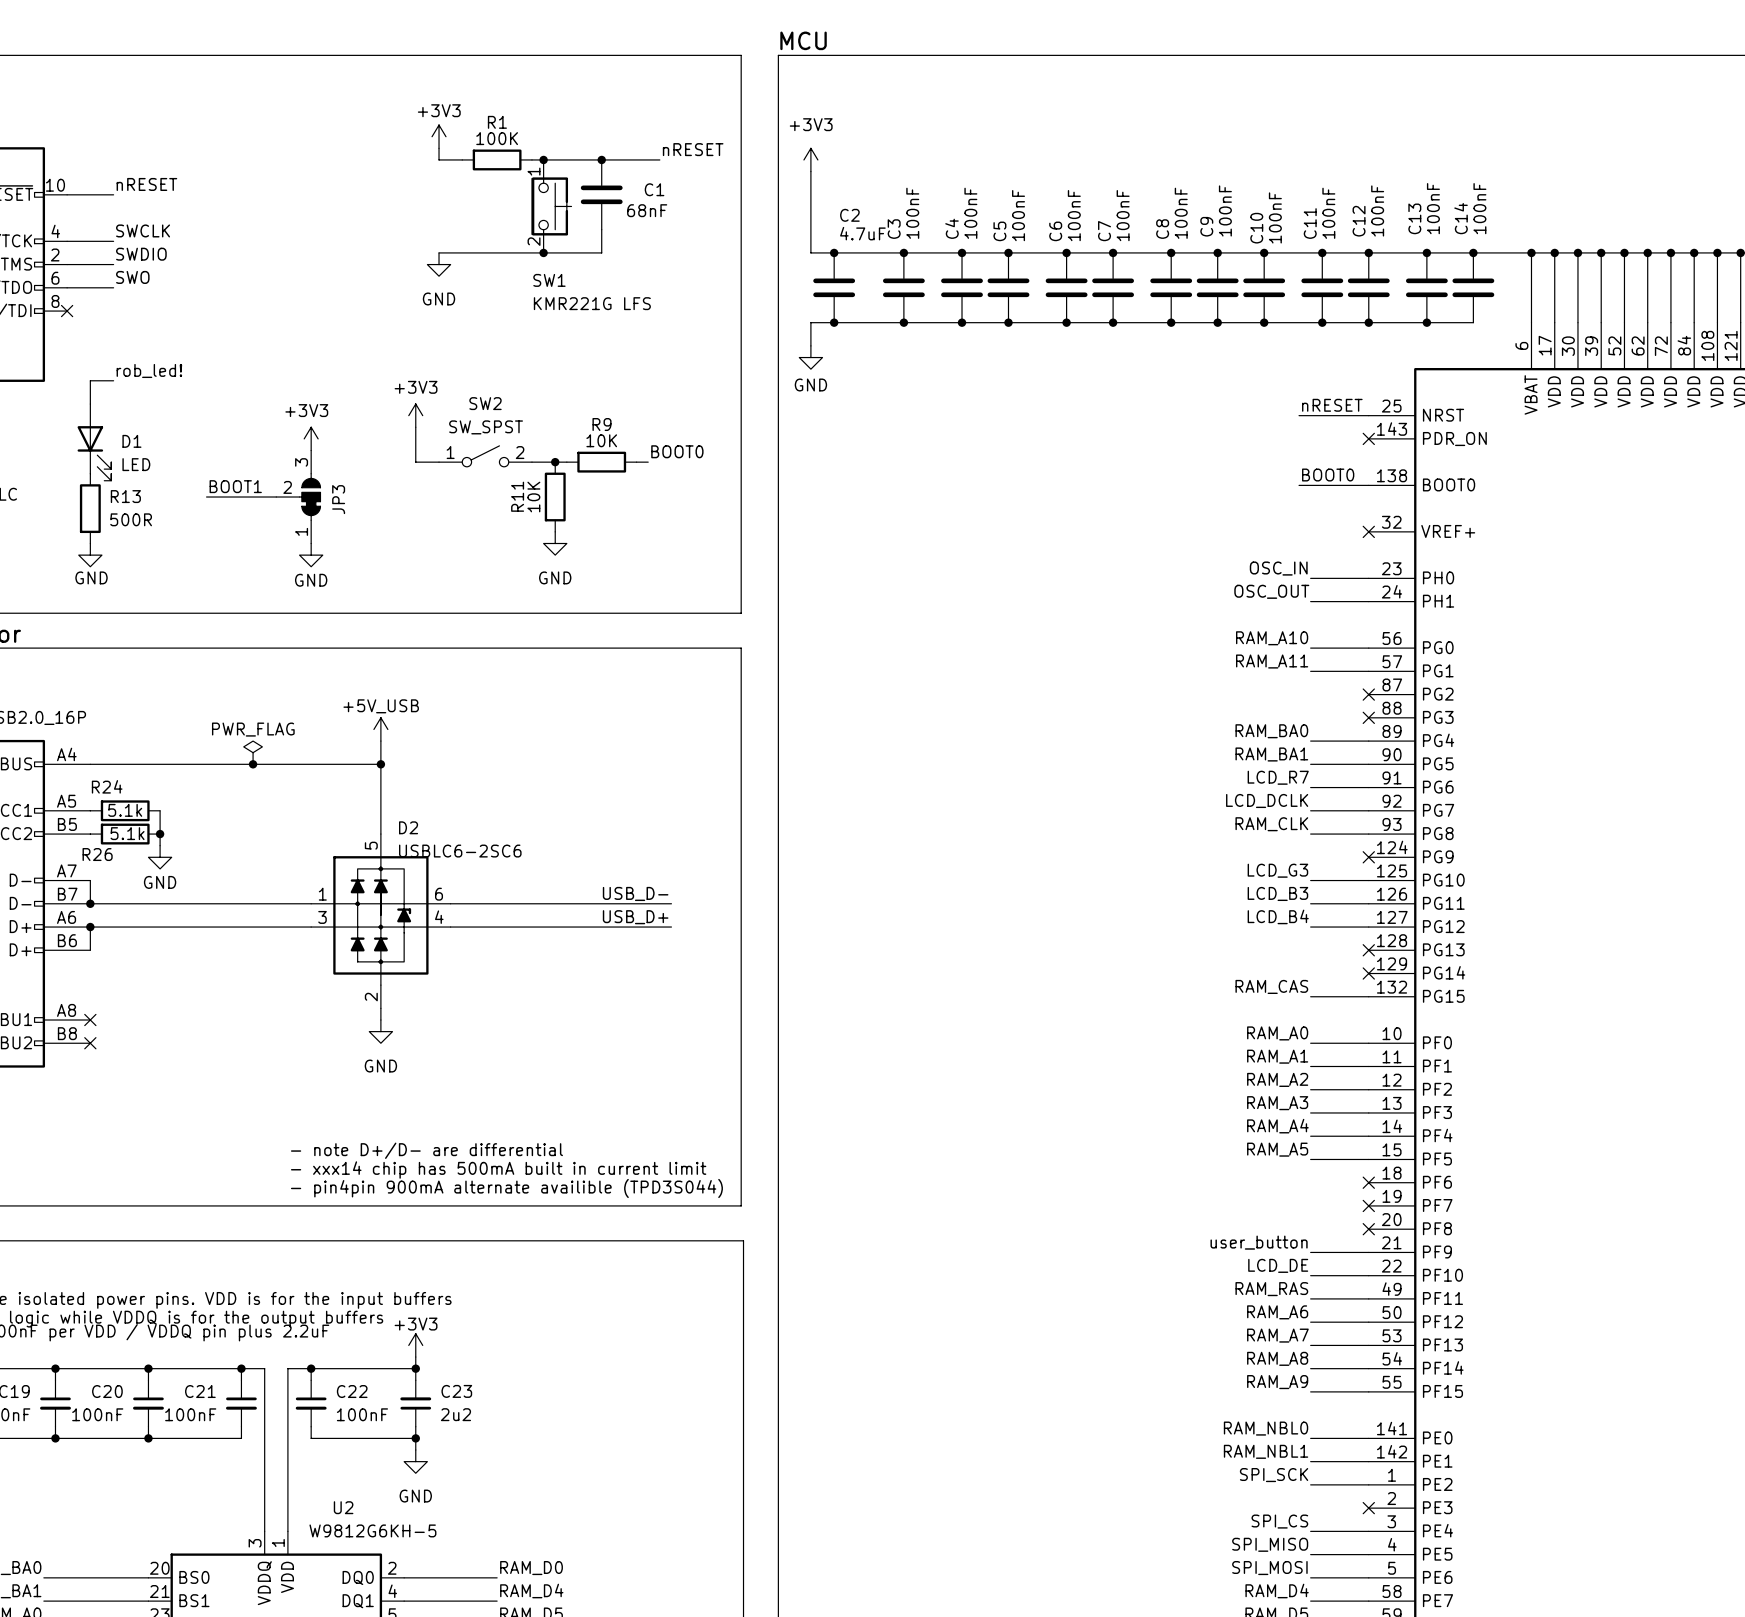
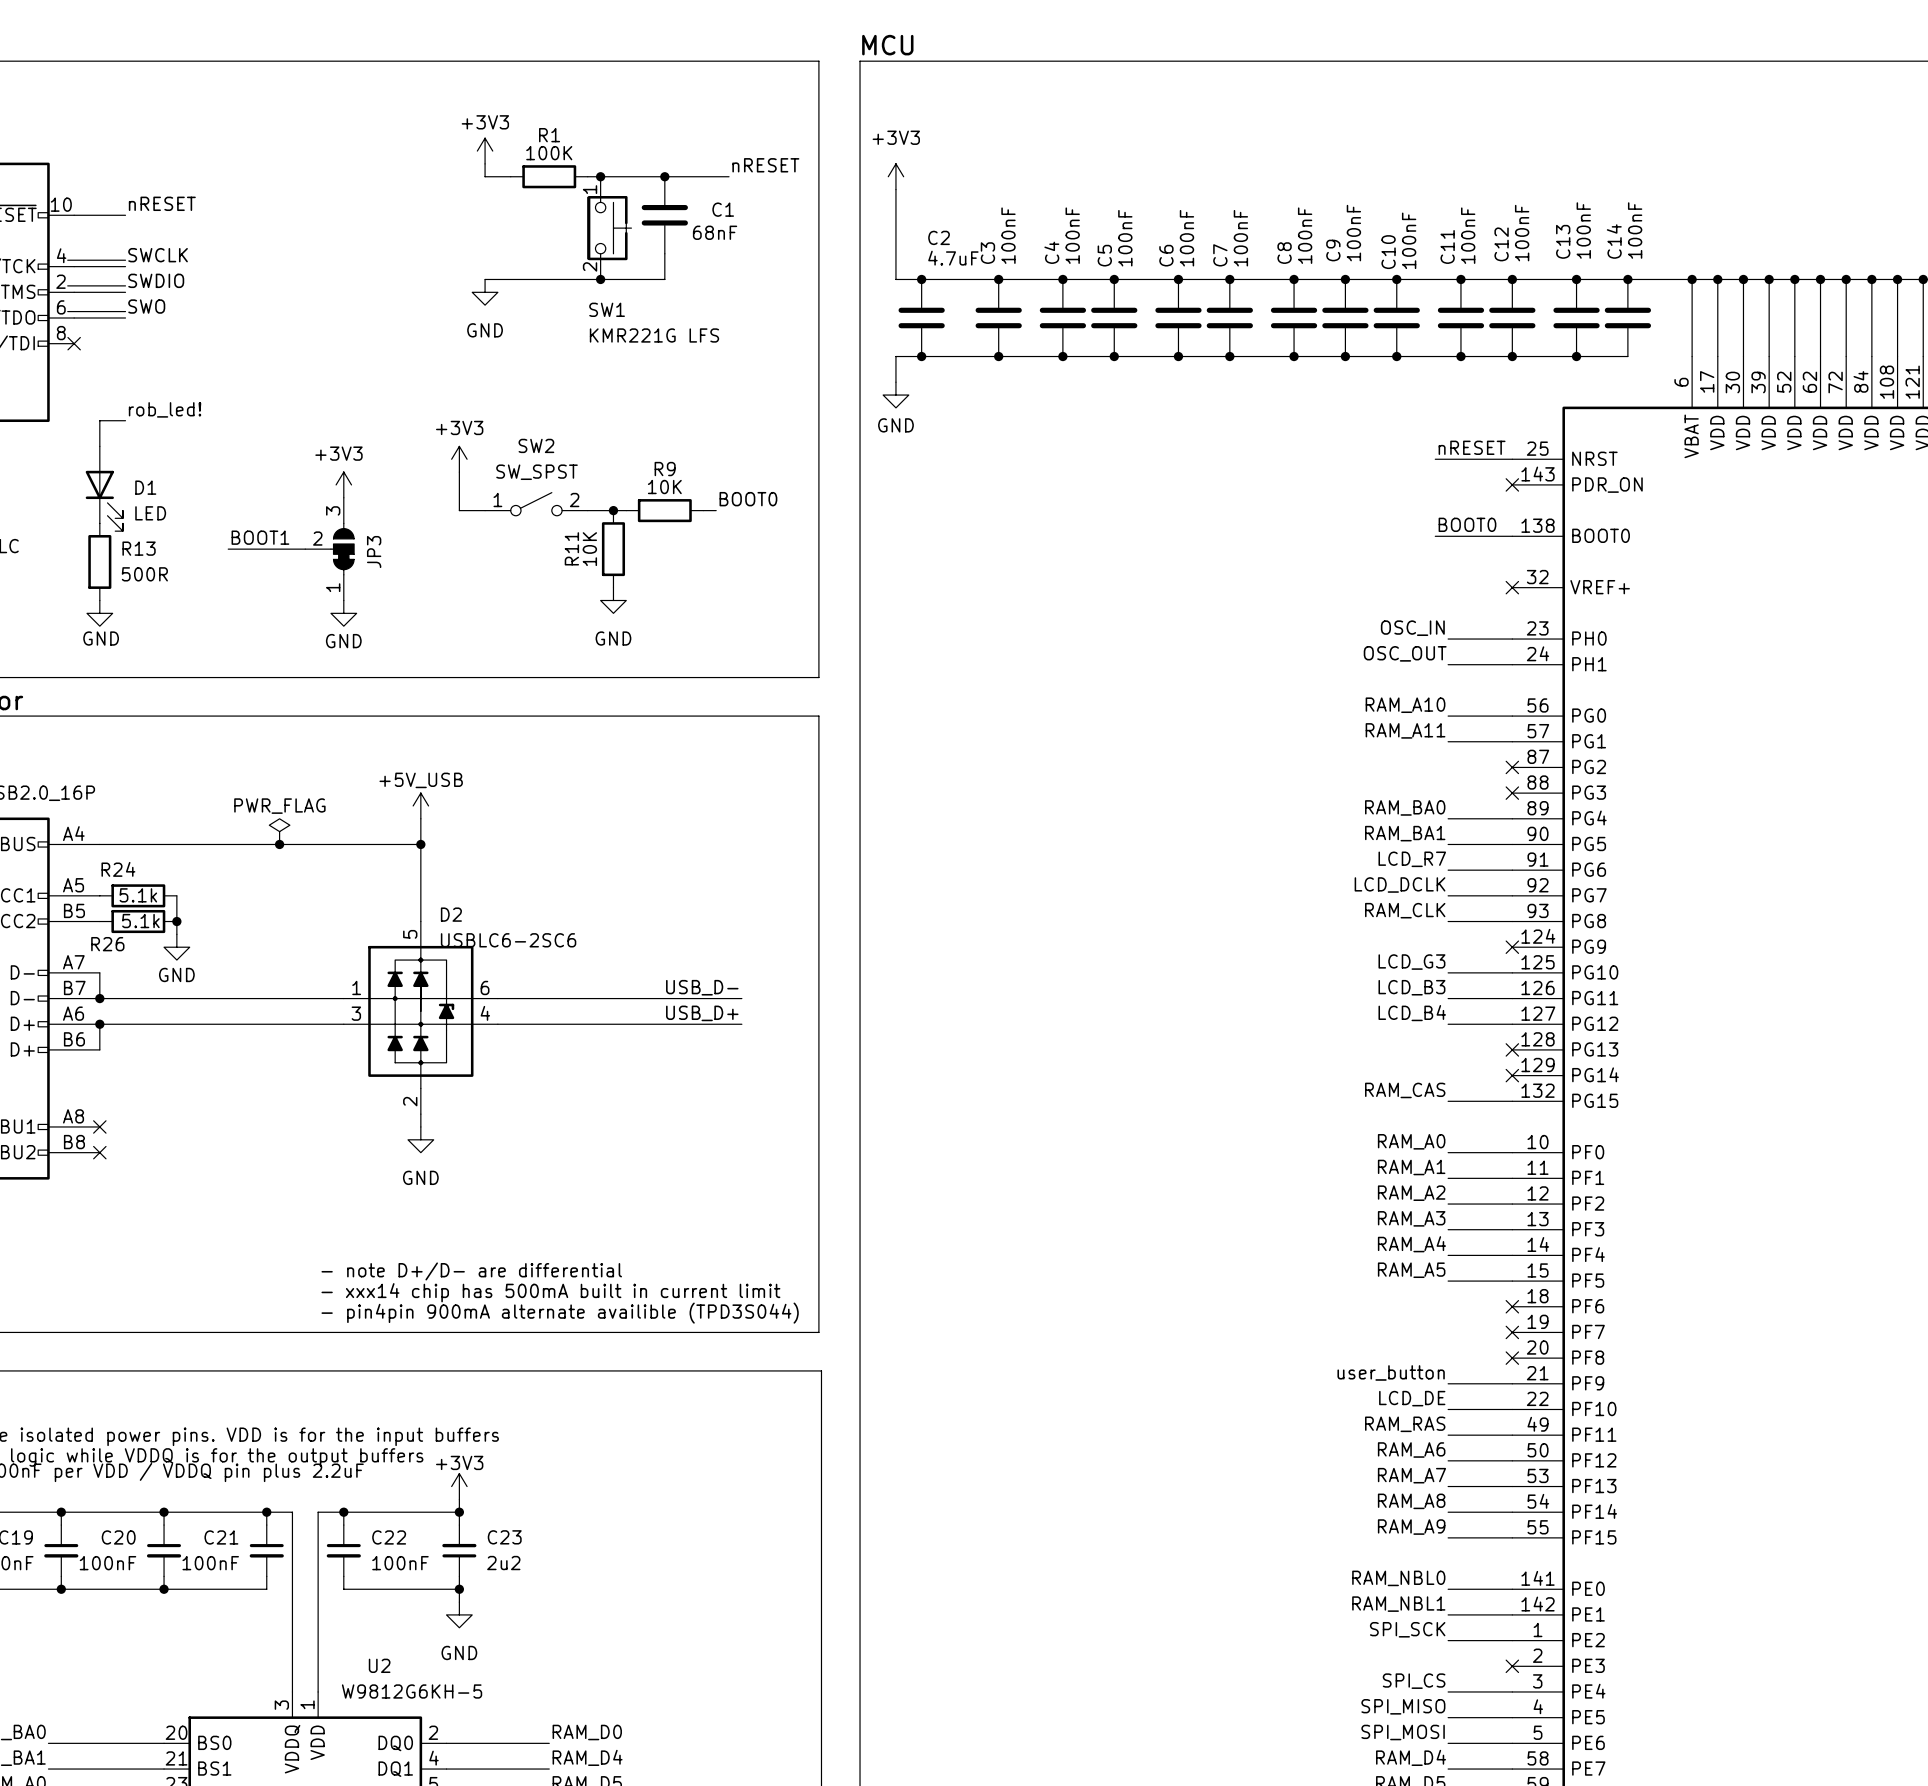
wire: none -> (67, 260) (125, 260)
wire: none -> (67, 285) (125, 285)
wire: none -> (67, 311) (125, 311)

